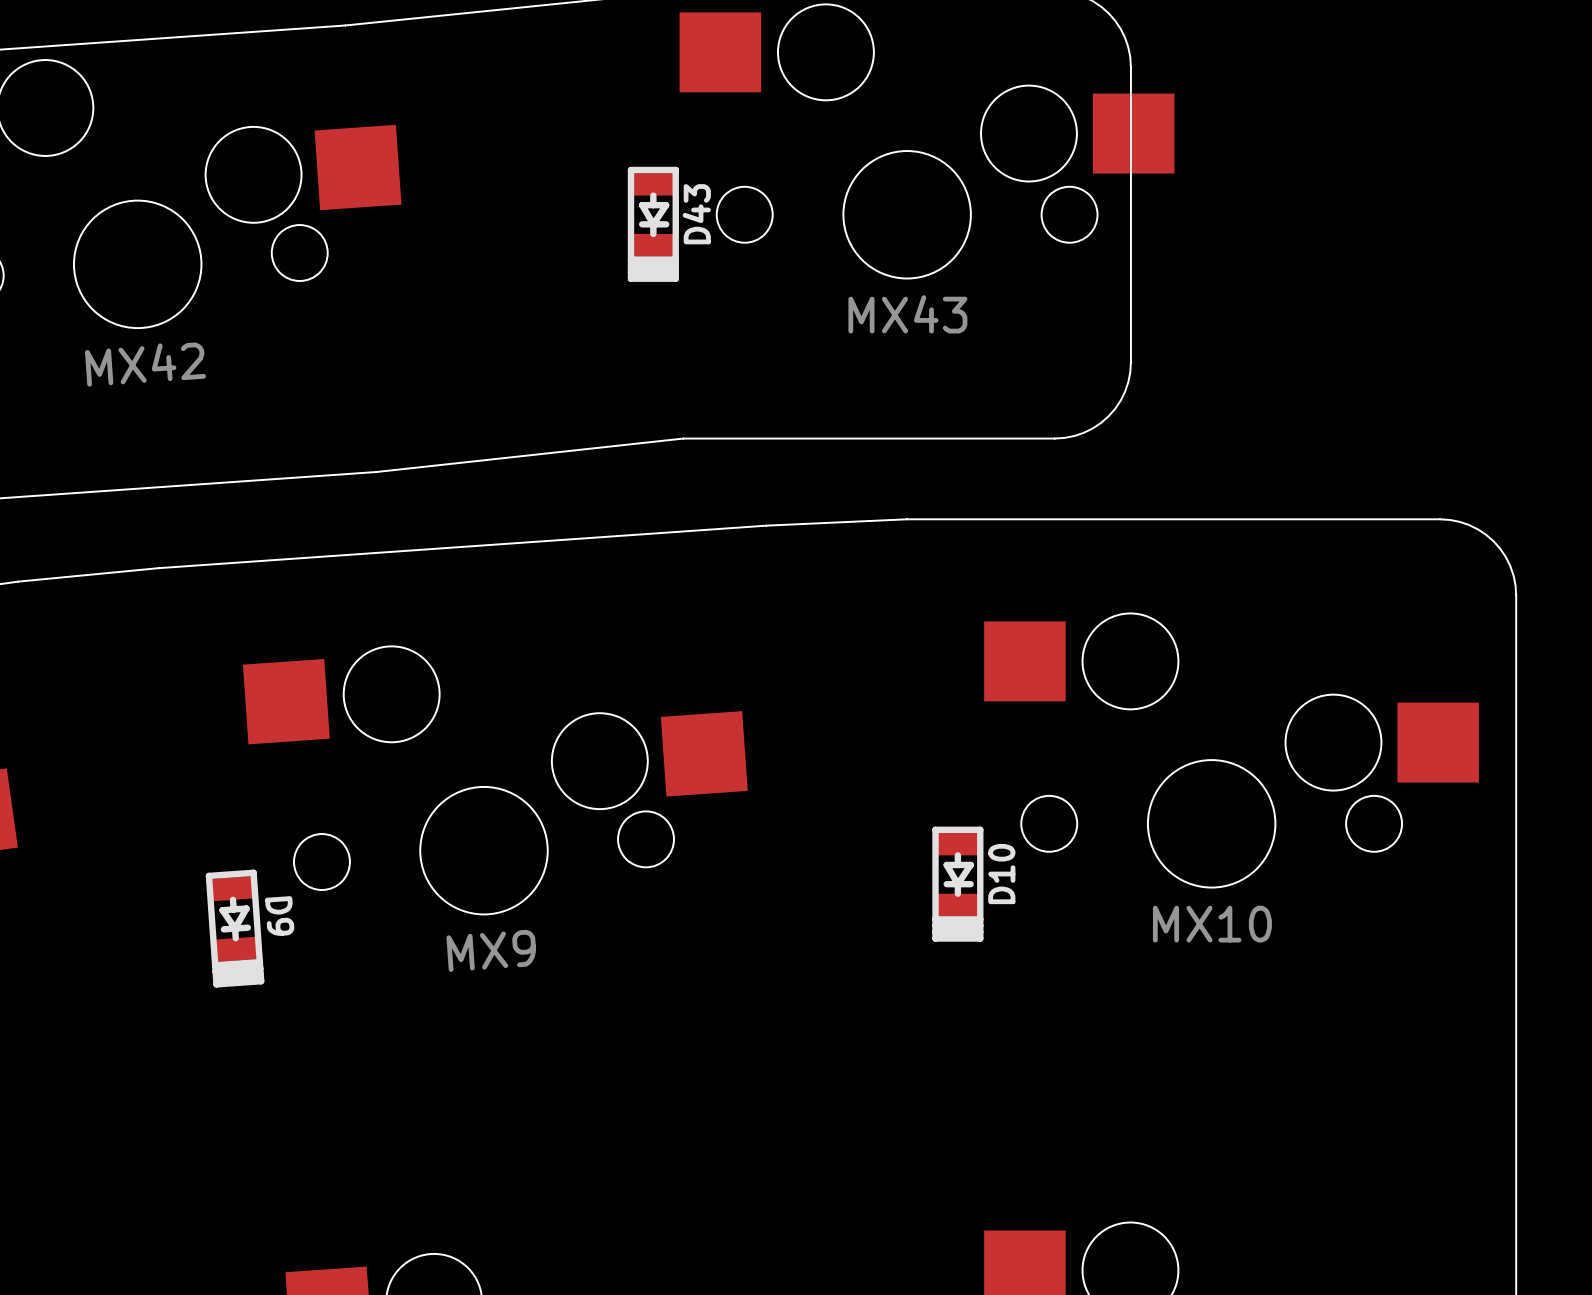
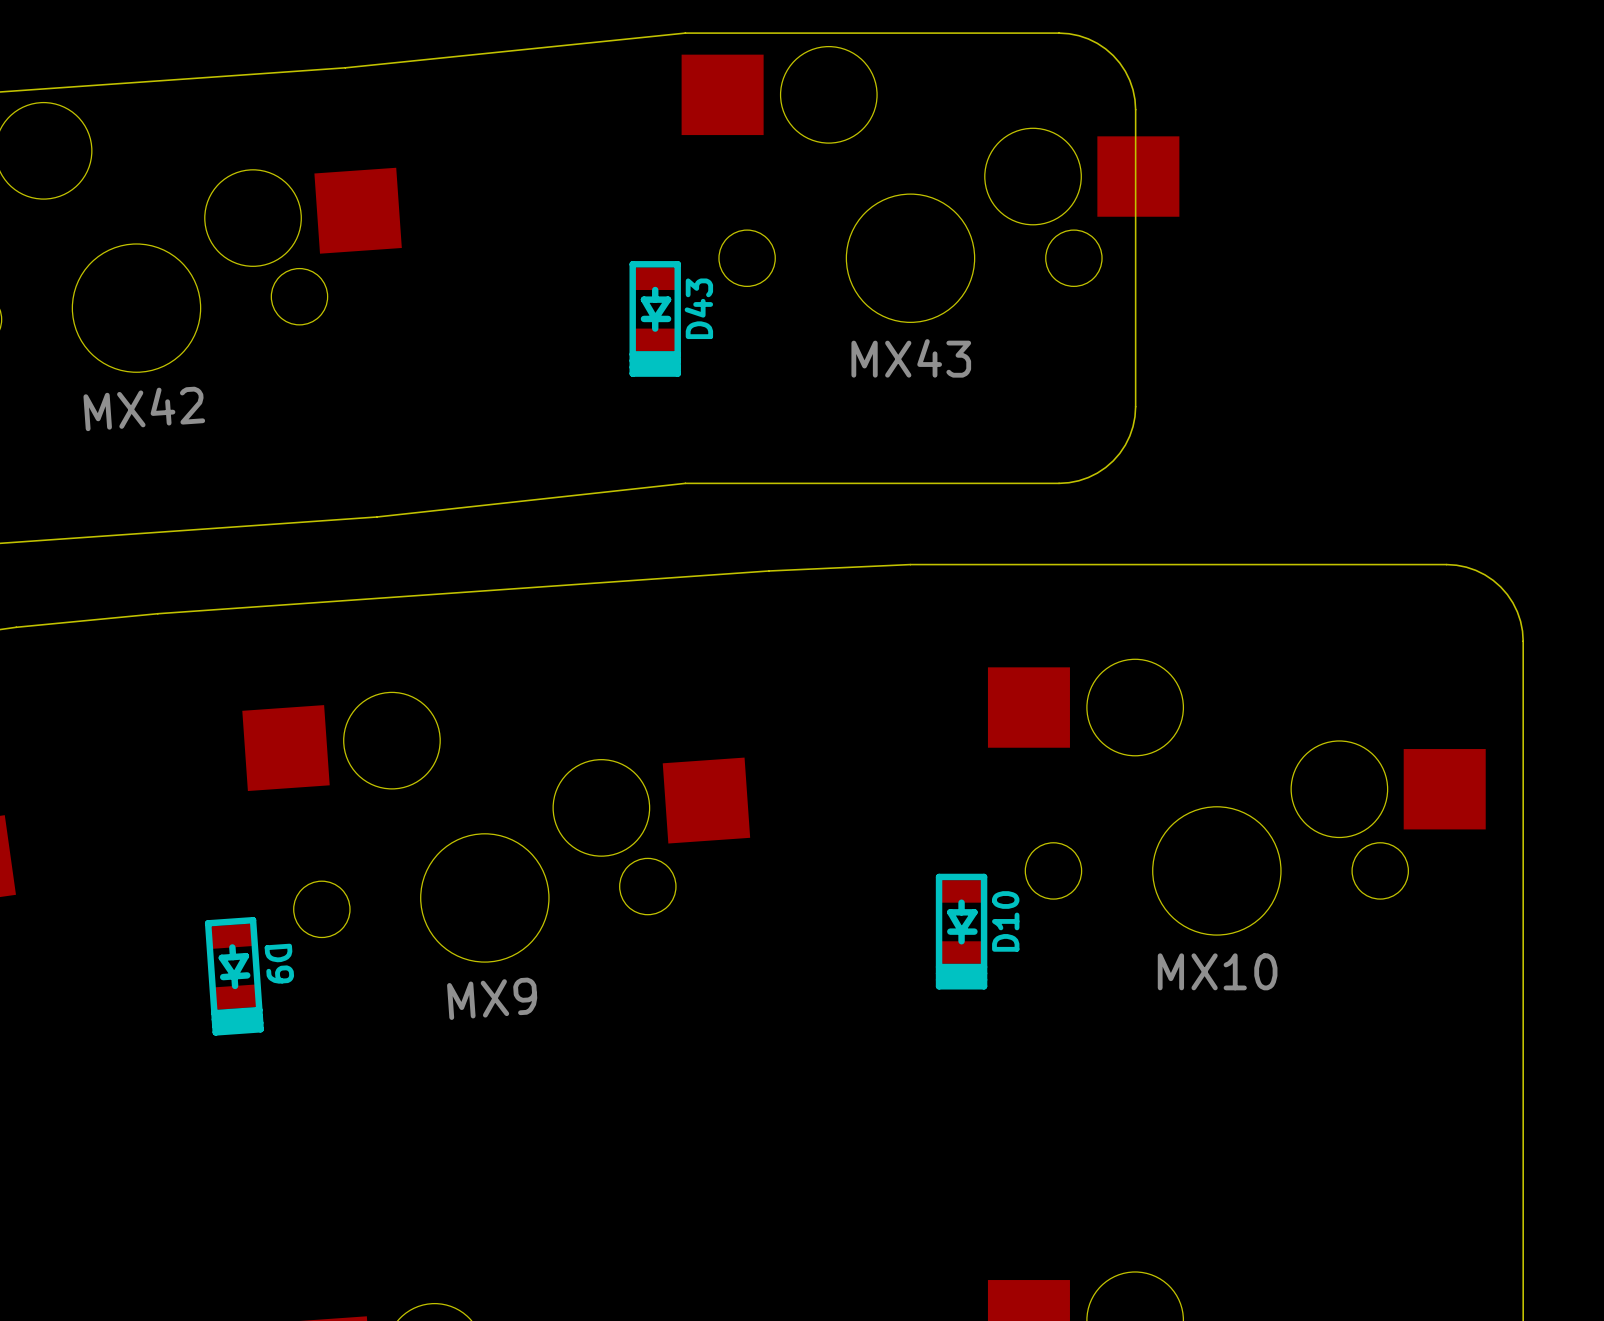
D43 position: (653, 224) -> (655, 318)

